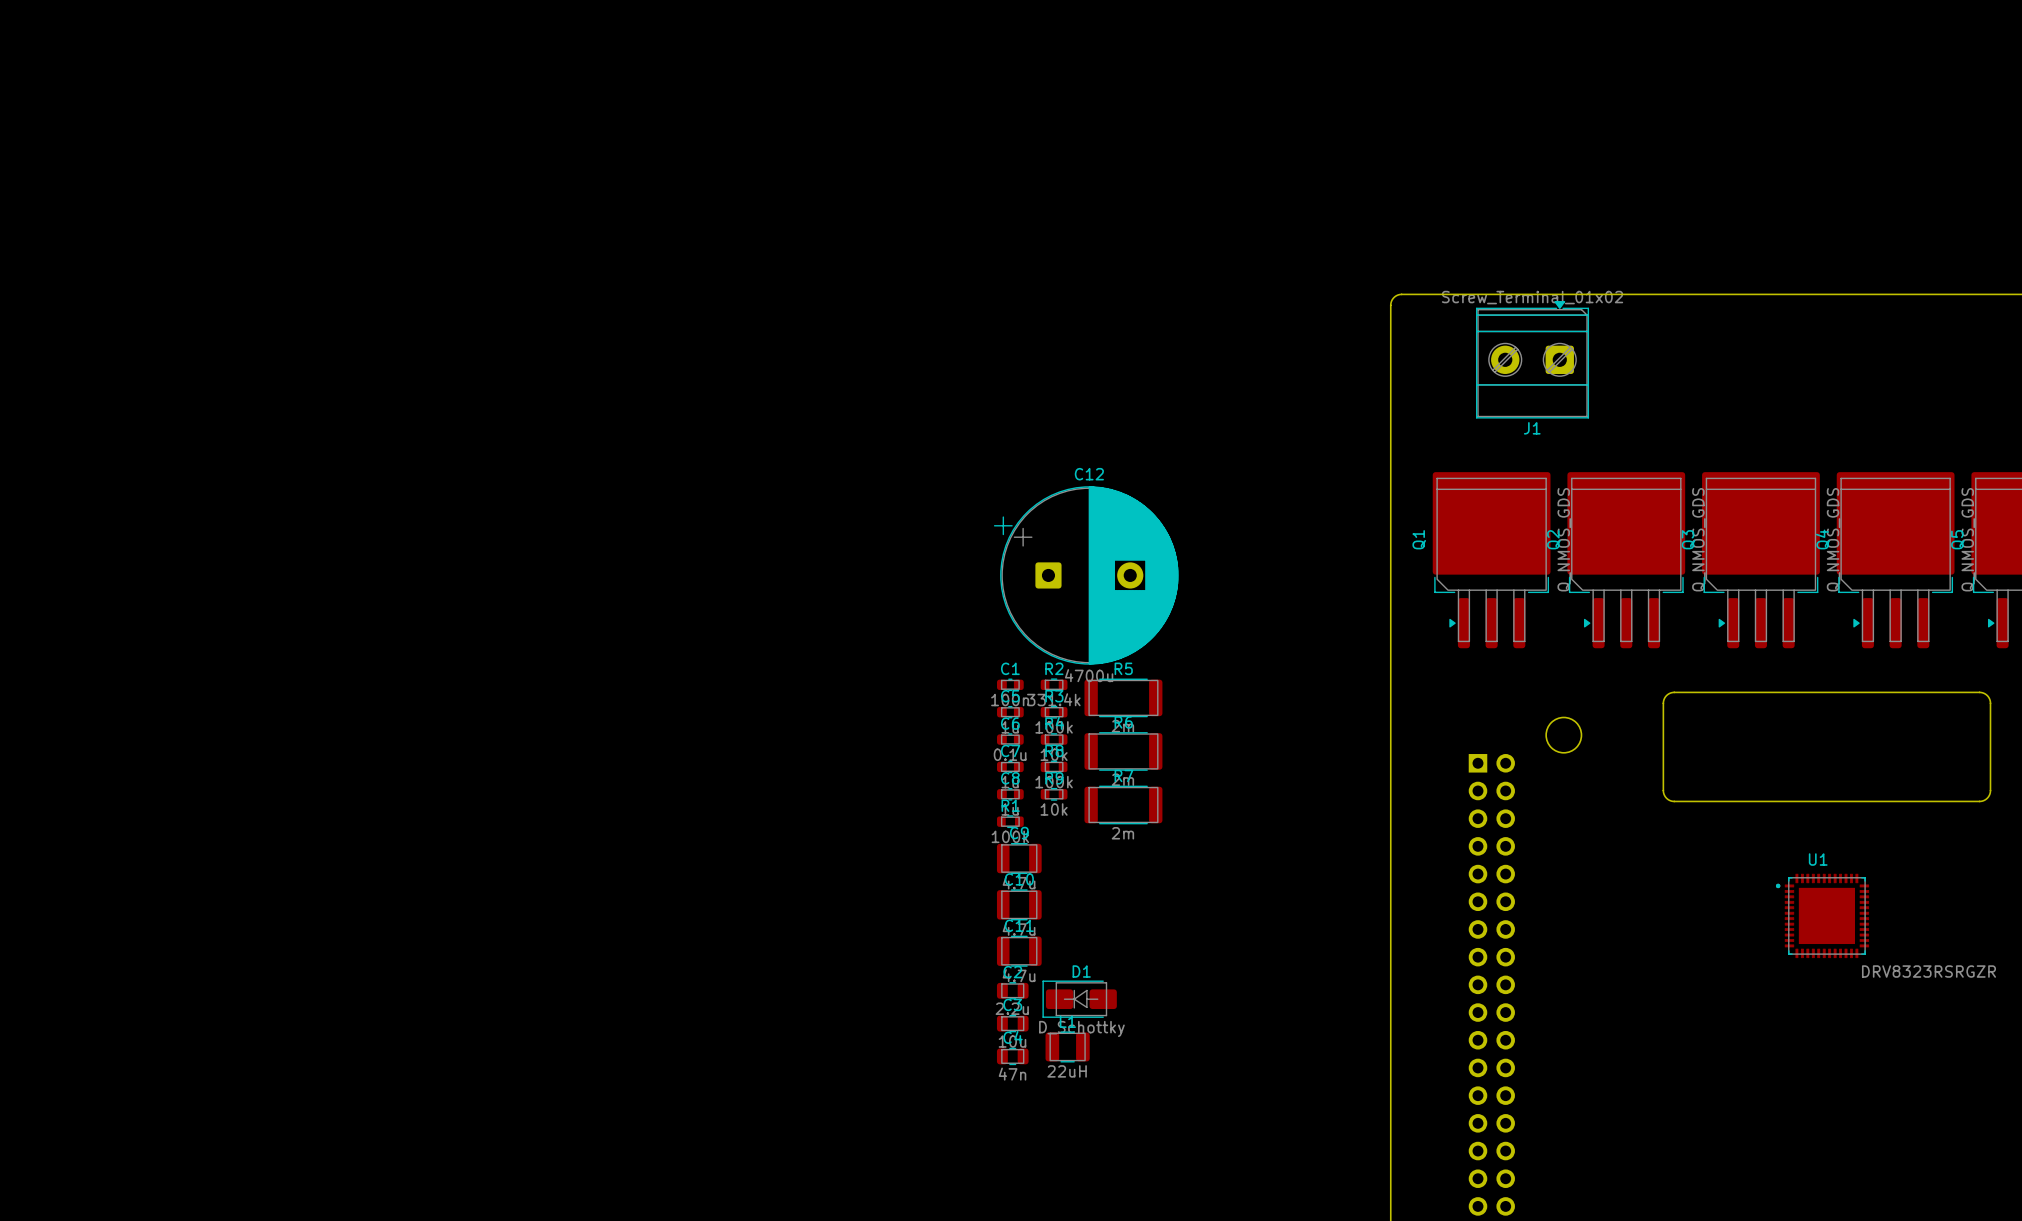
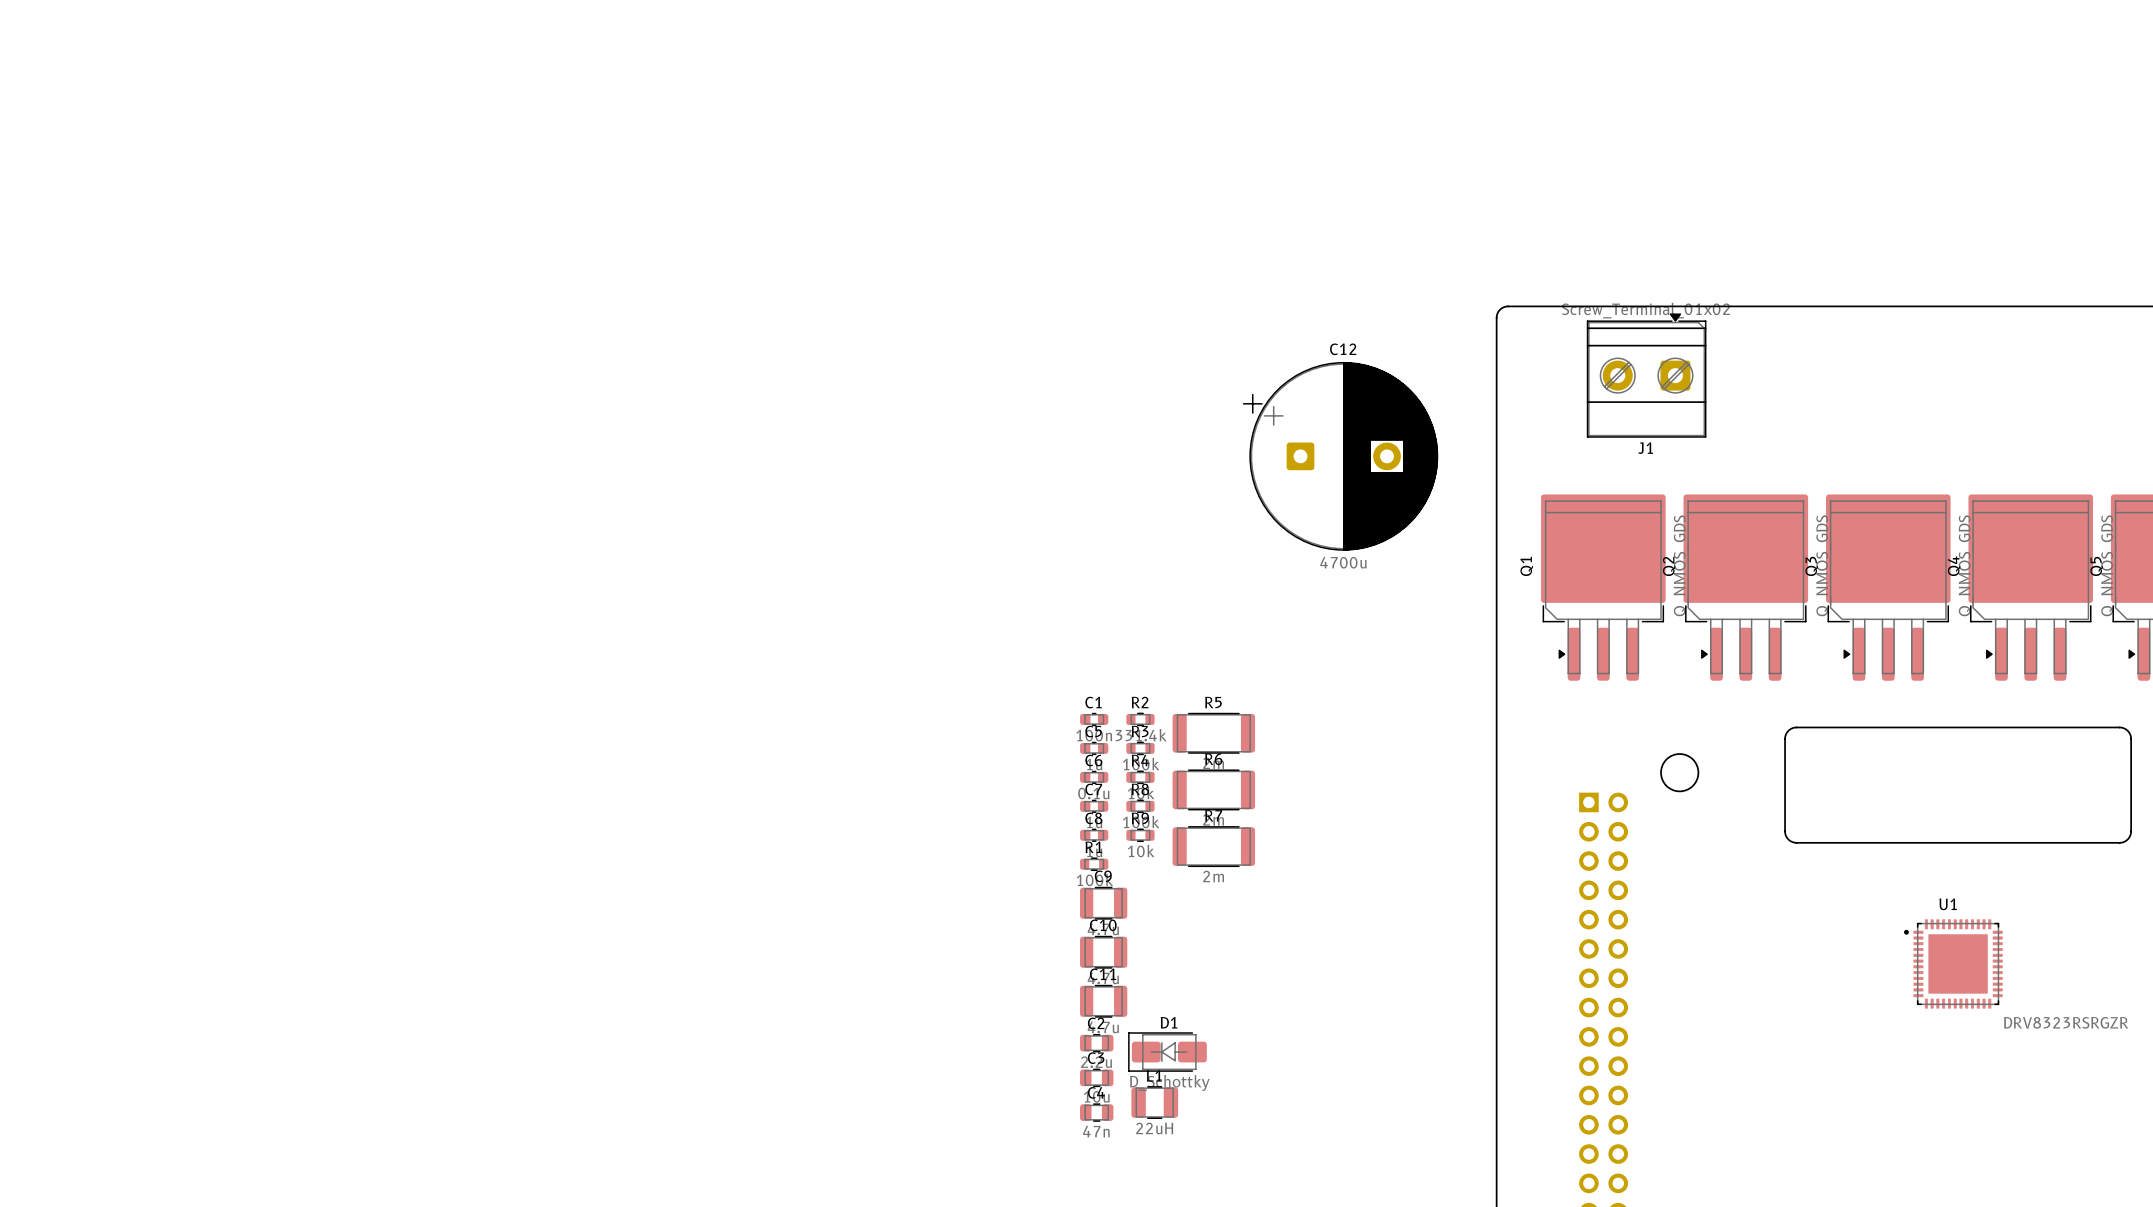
C12 position: (1086, 575) -> (1340, 456)

